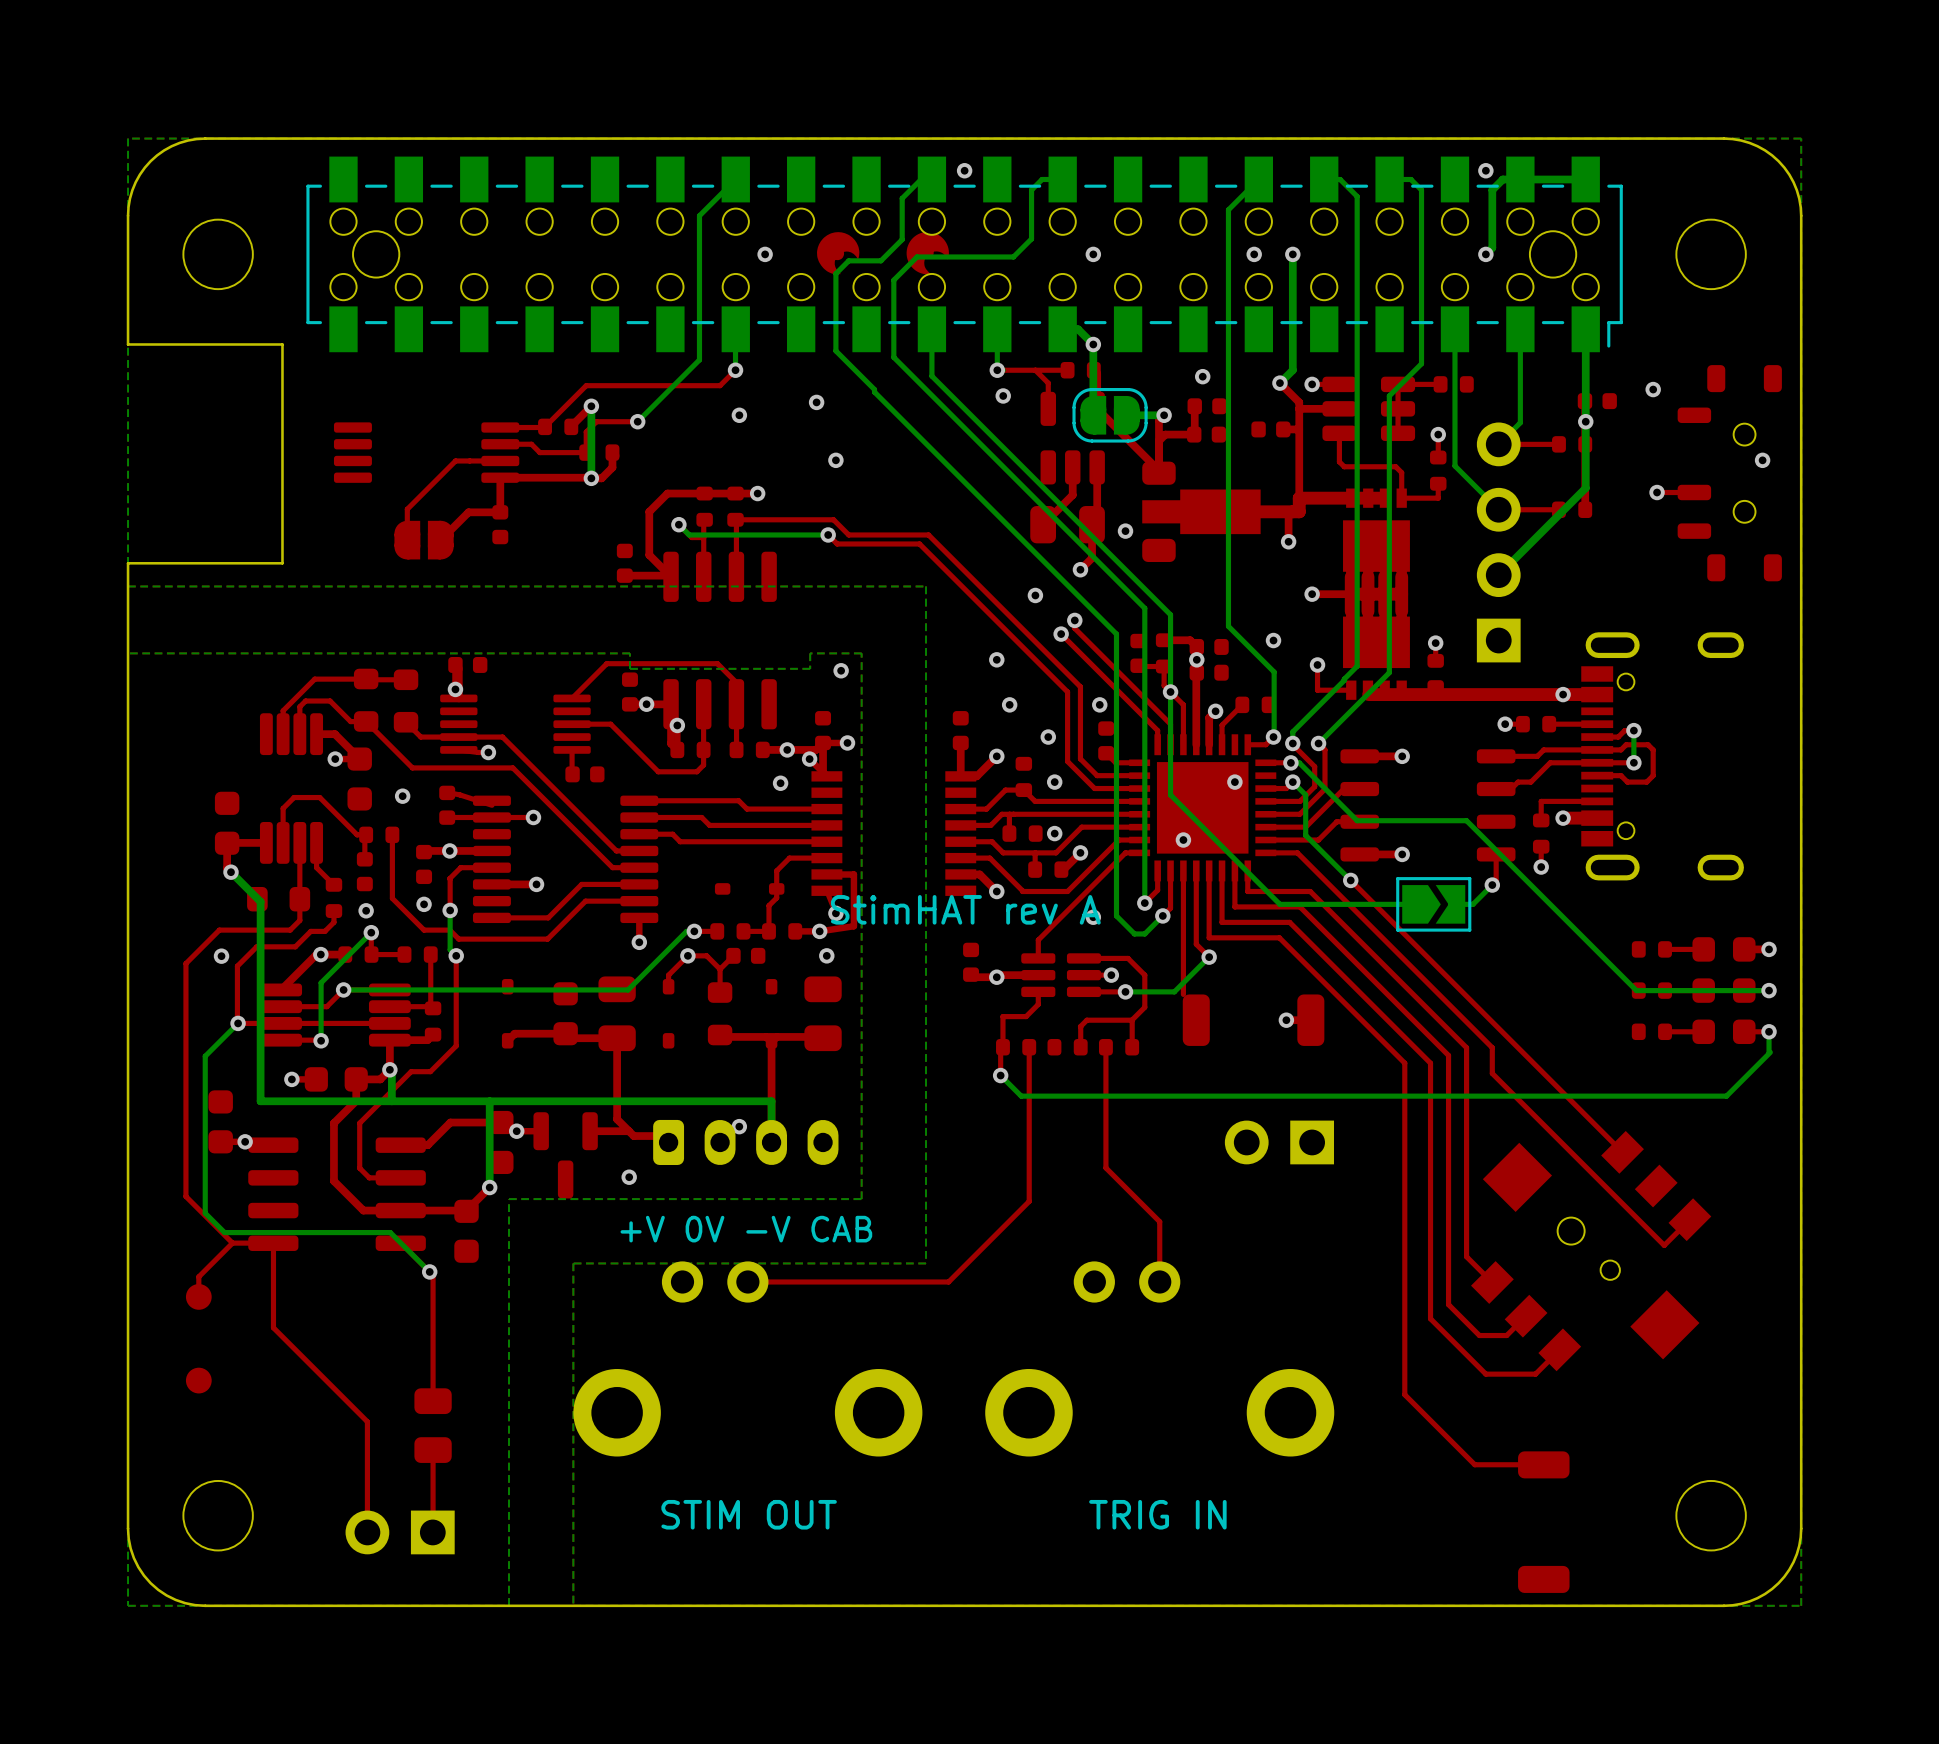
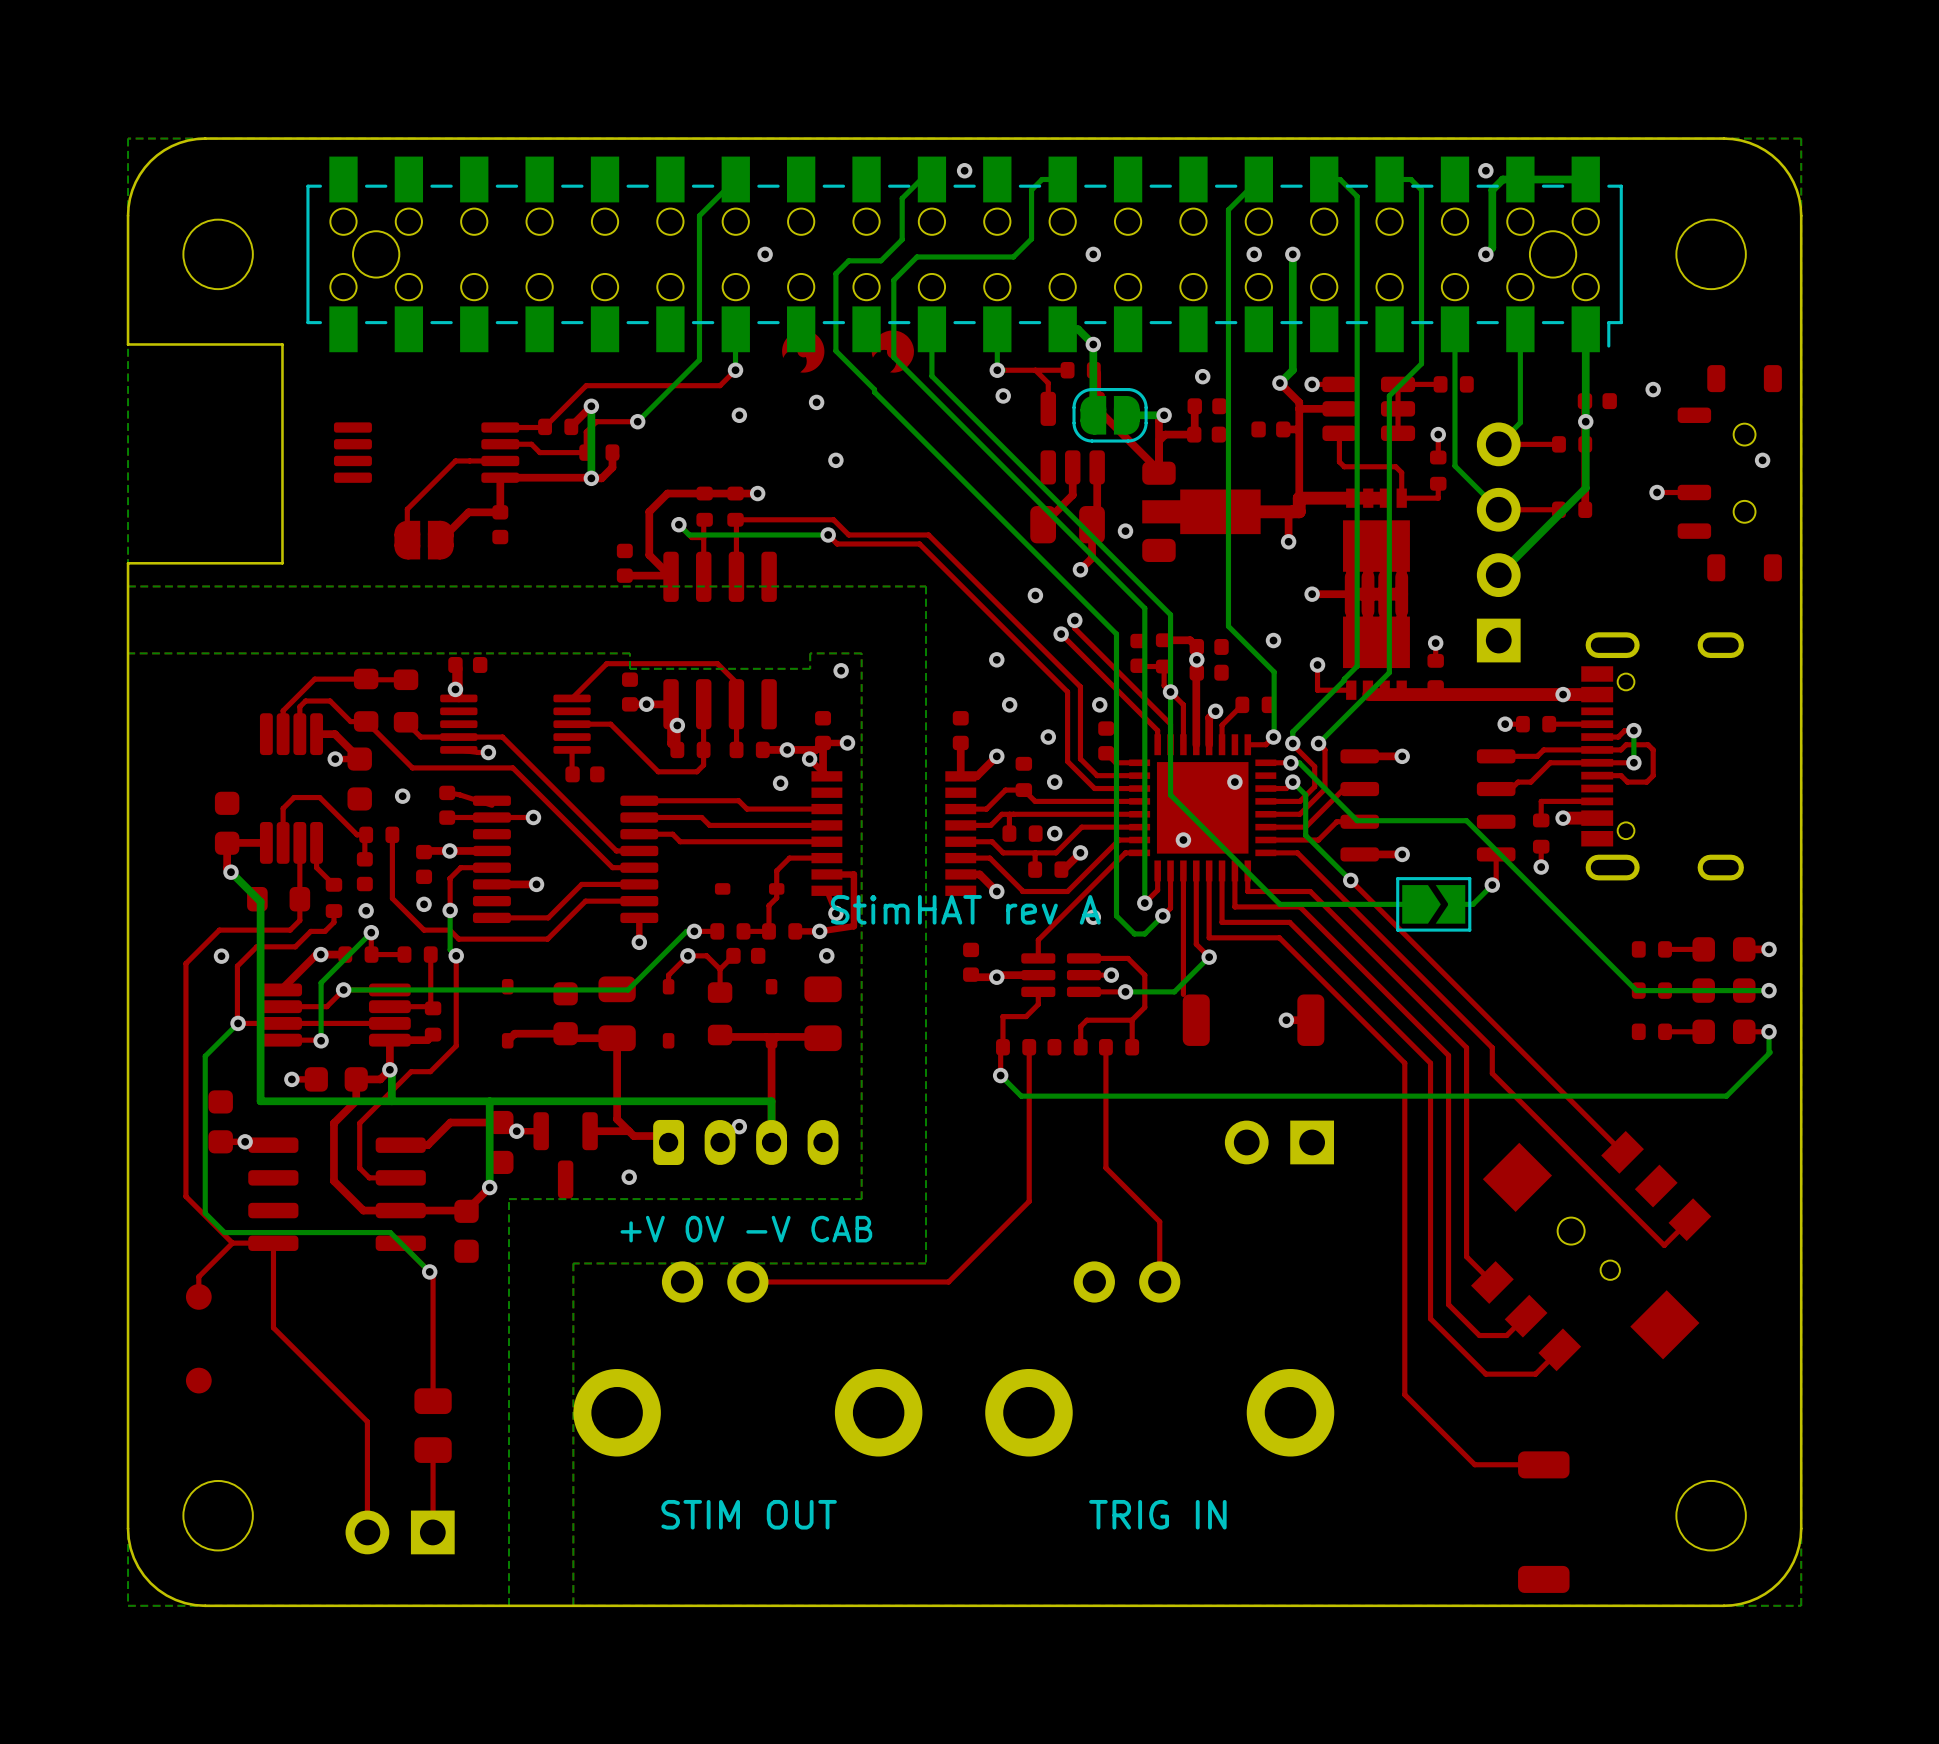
part: (882, 253) -> none
part: none -> (848, 351)

